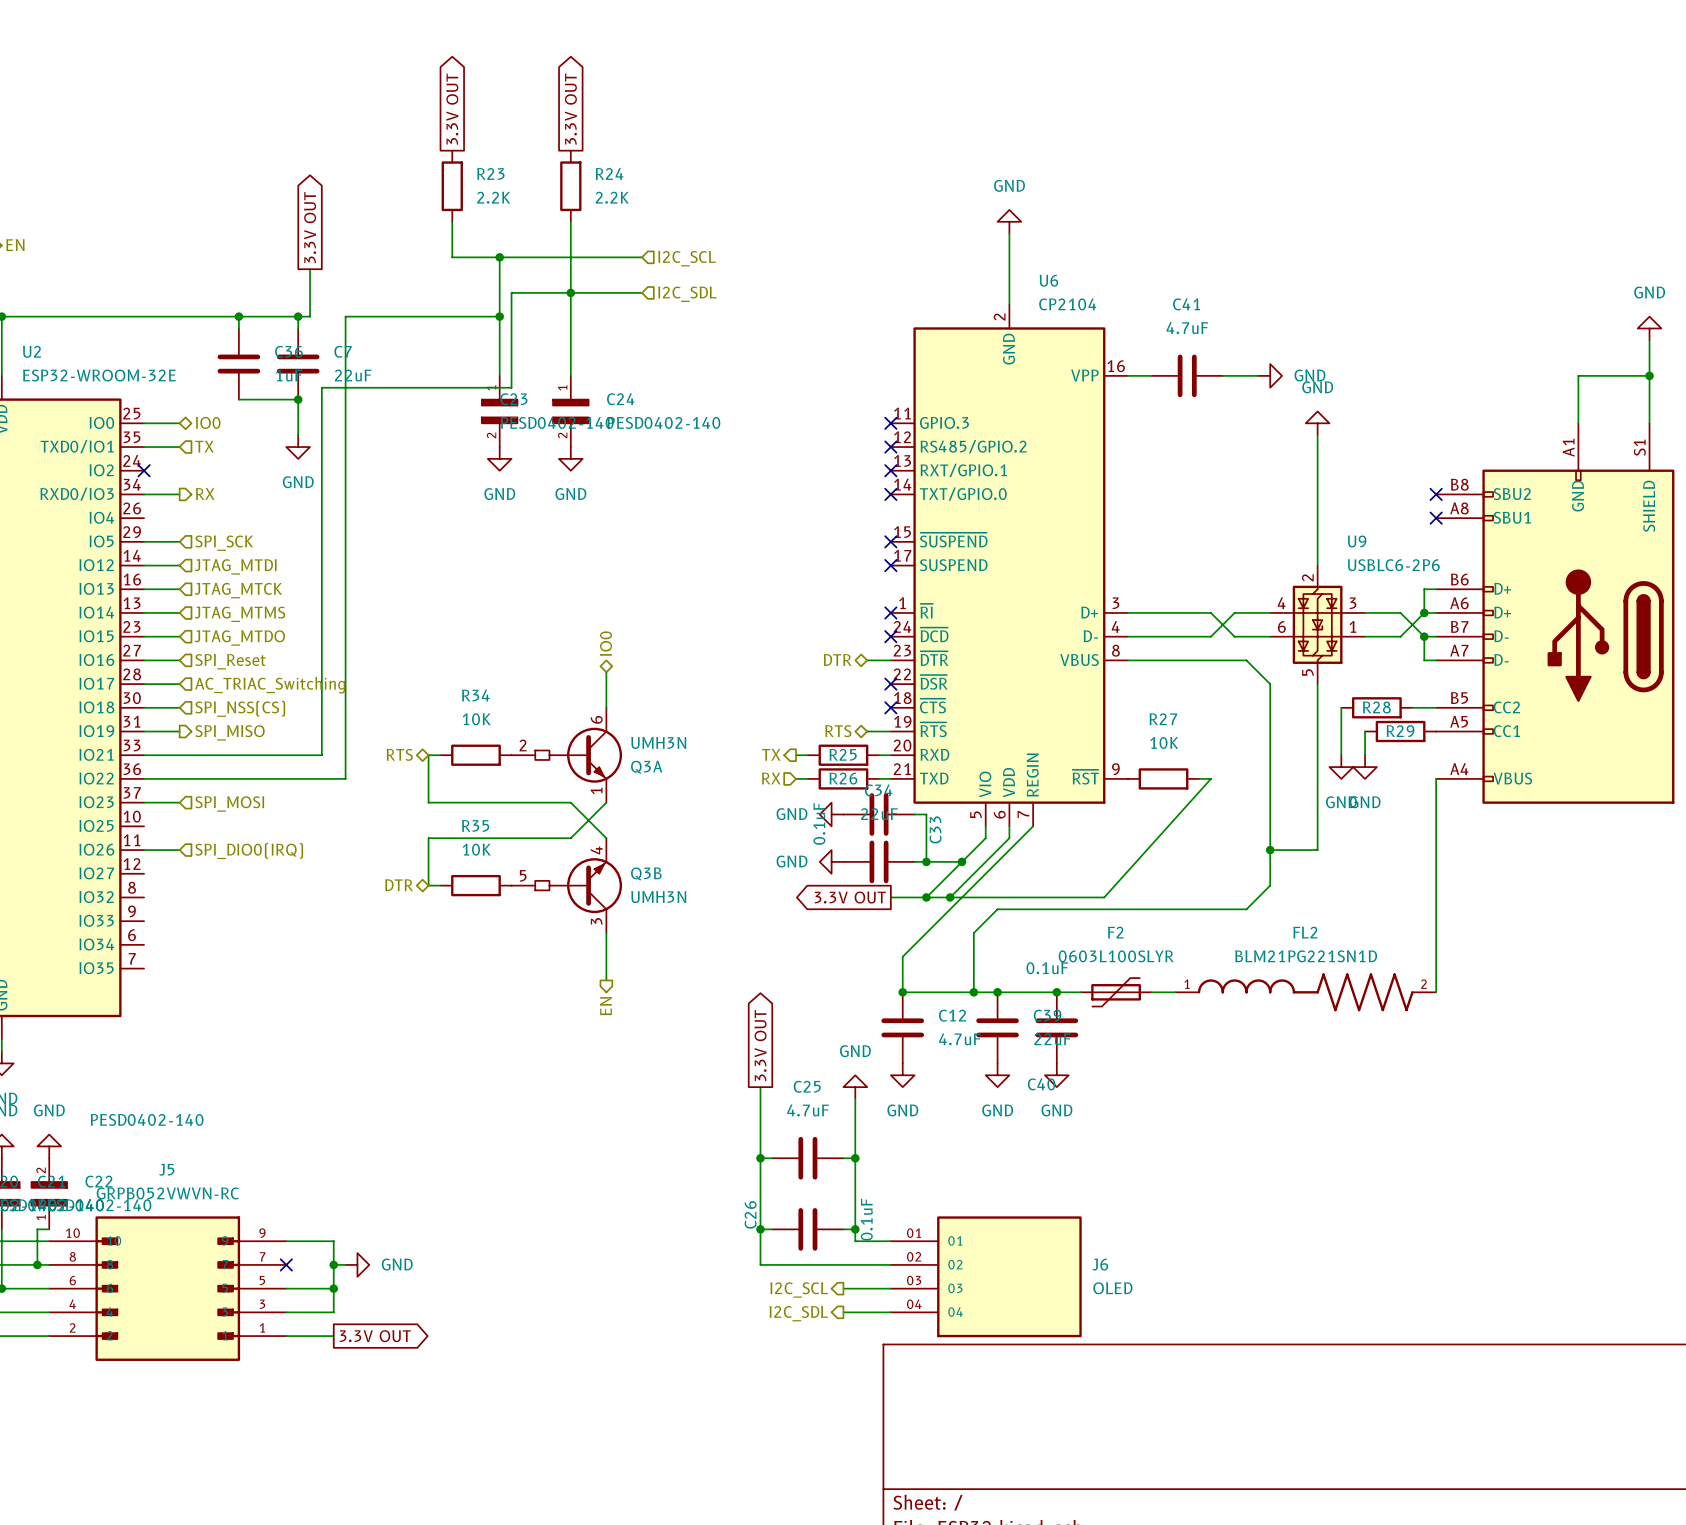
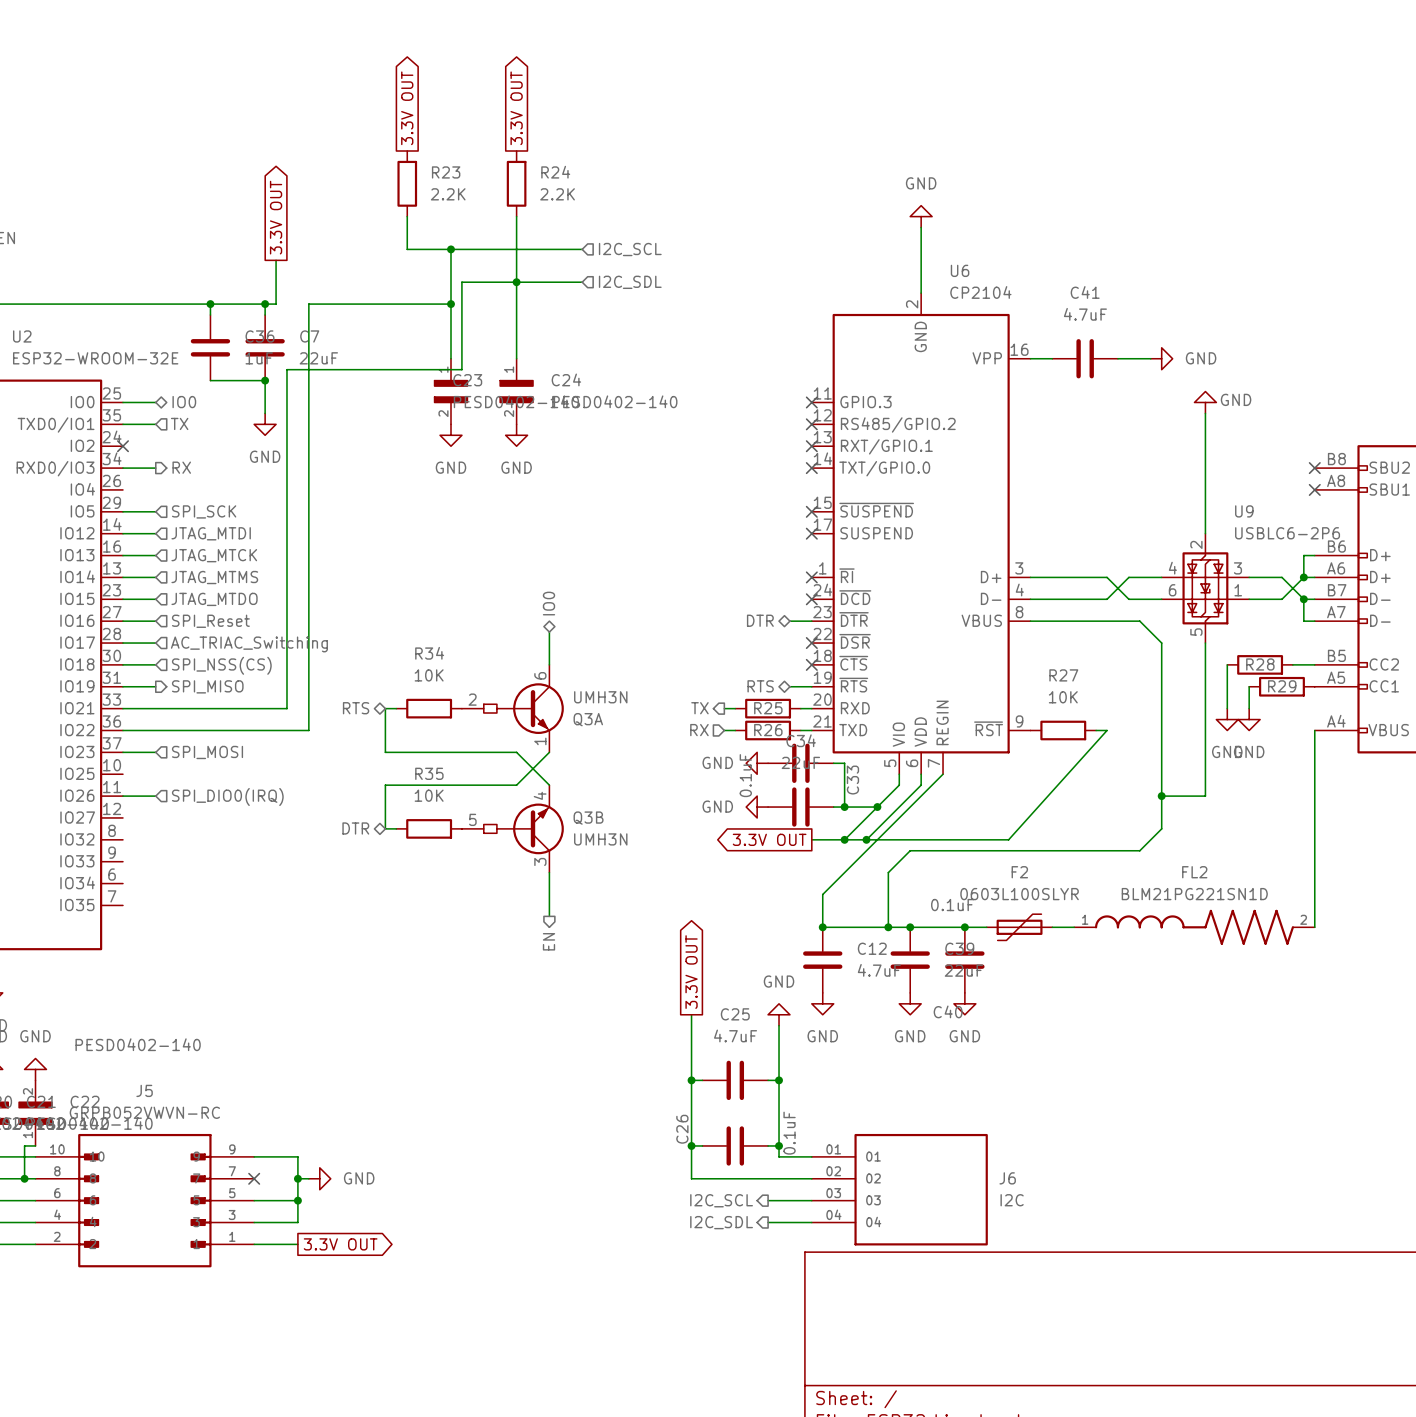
power symbol text position: GND (1317, 387) -> GND (1236, 399)
J6 value: OLED (1112, 1288) -> I2C (1012, 1200)

